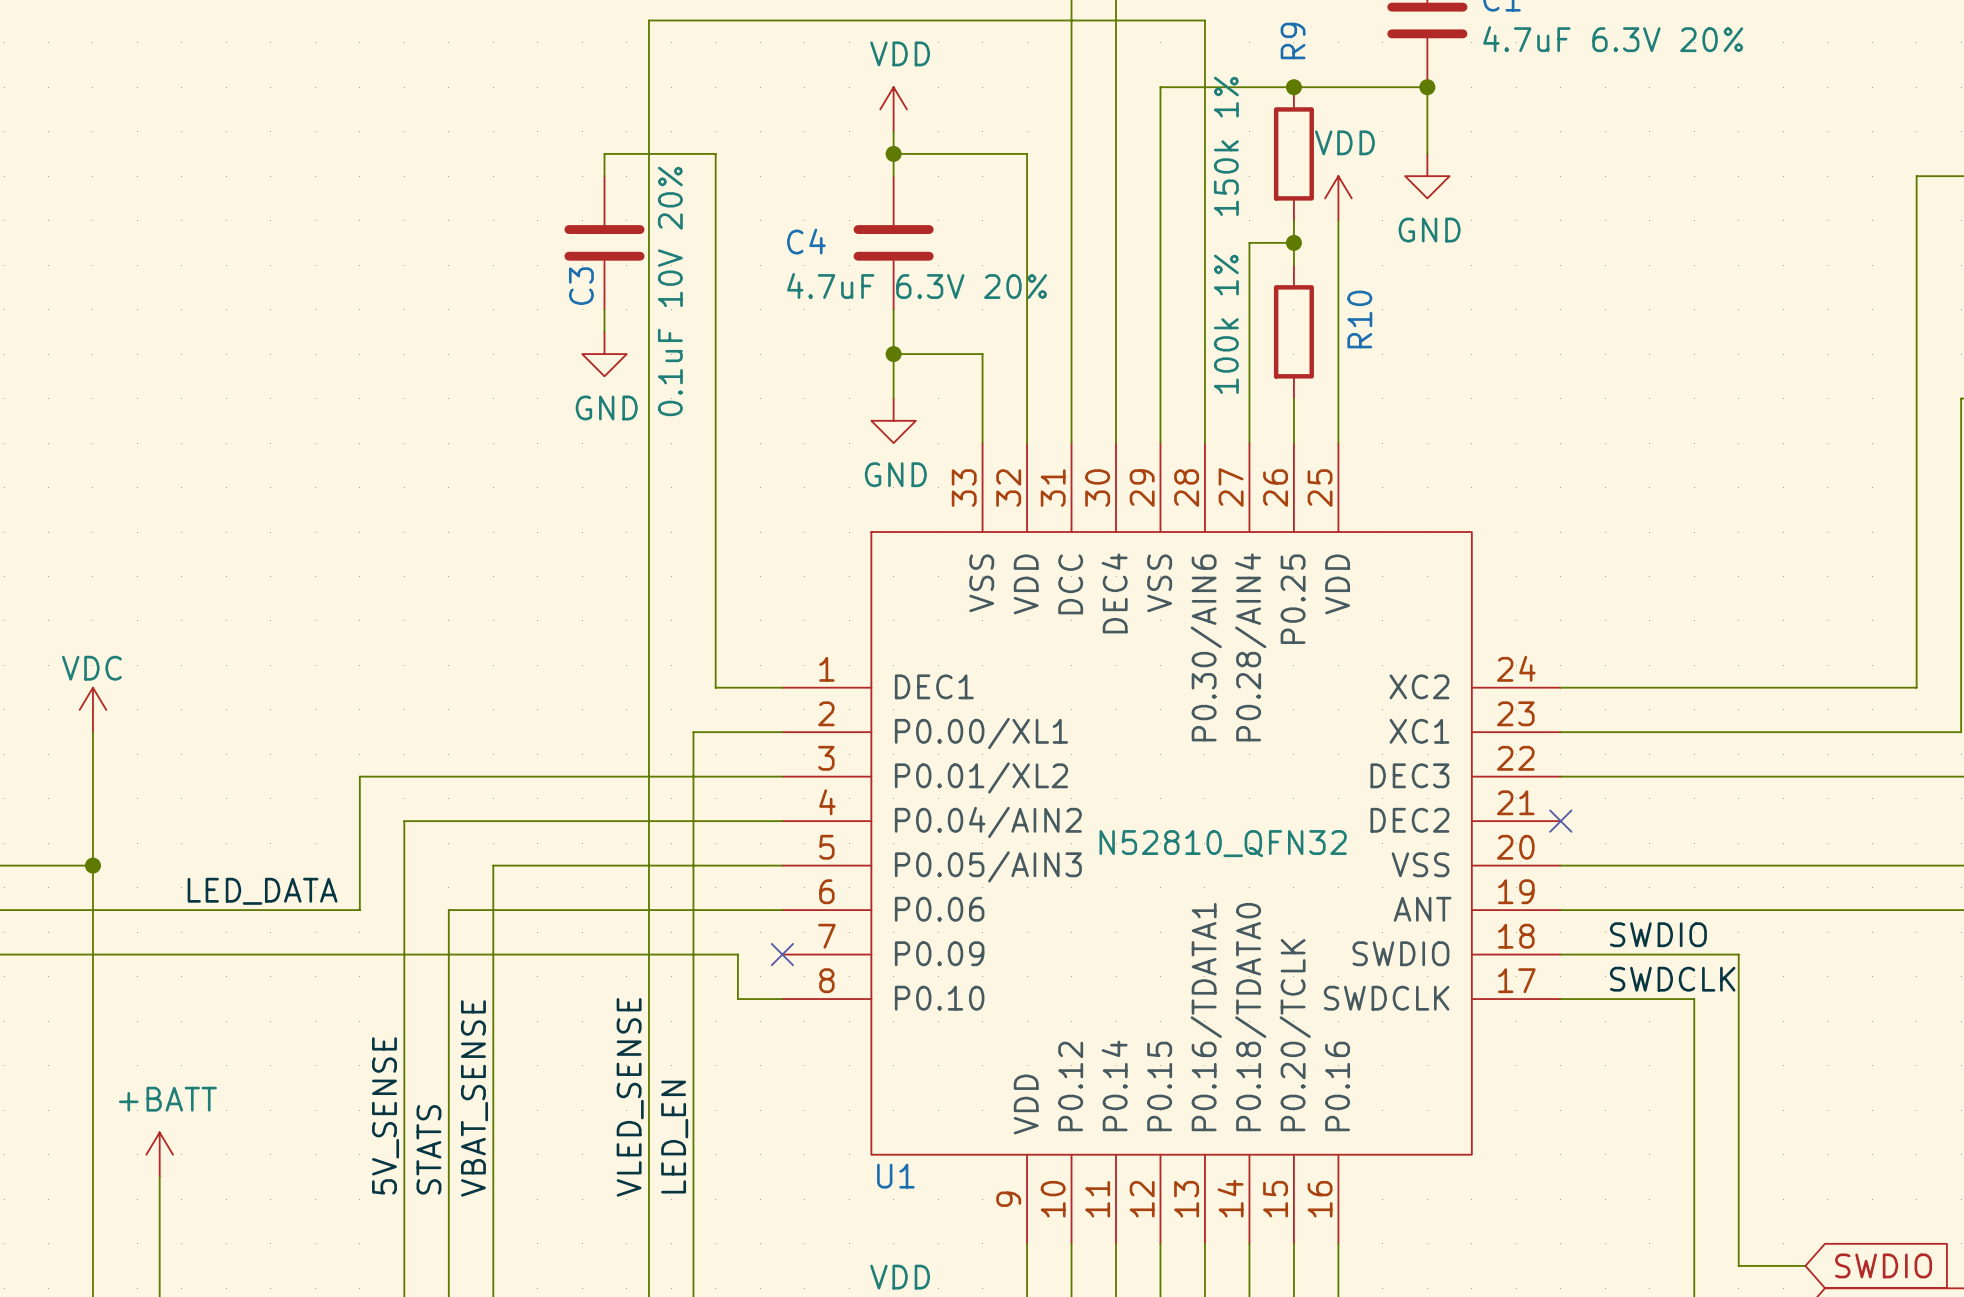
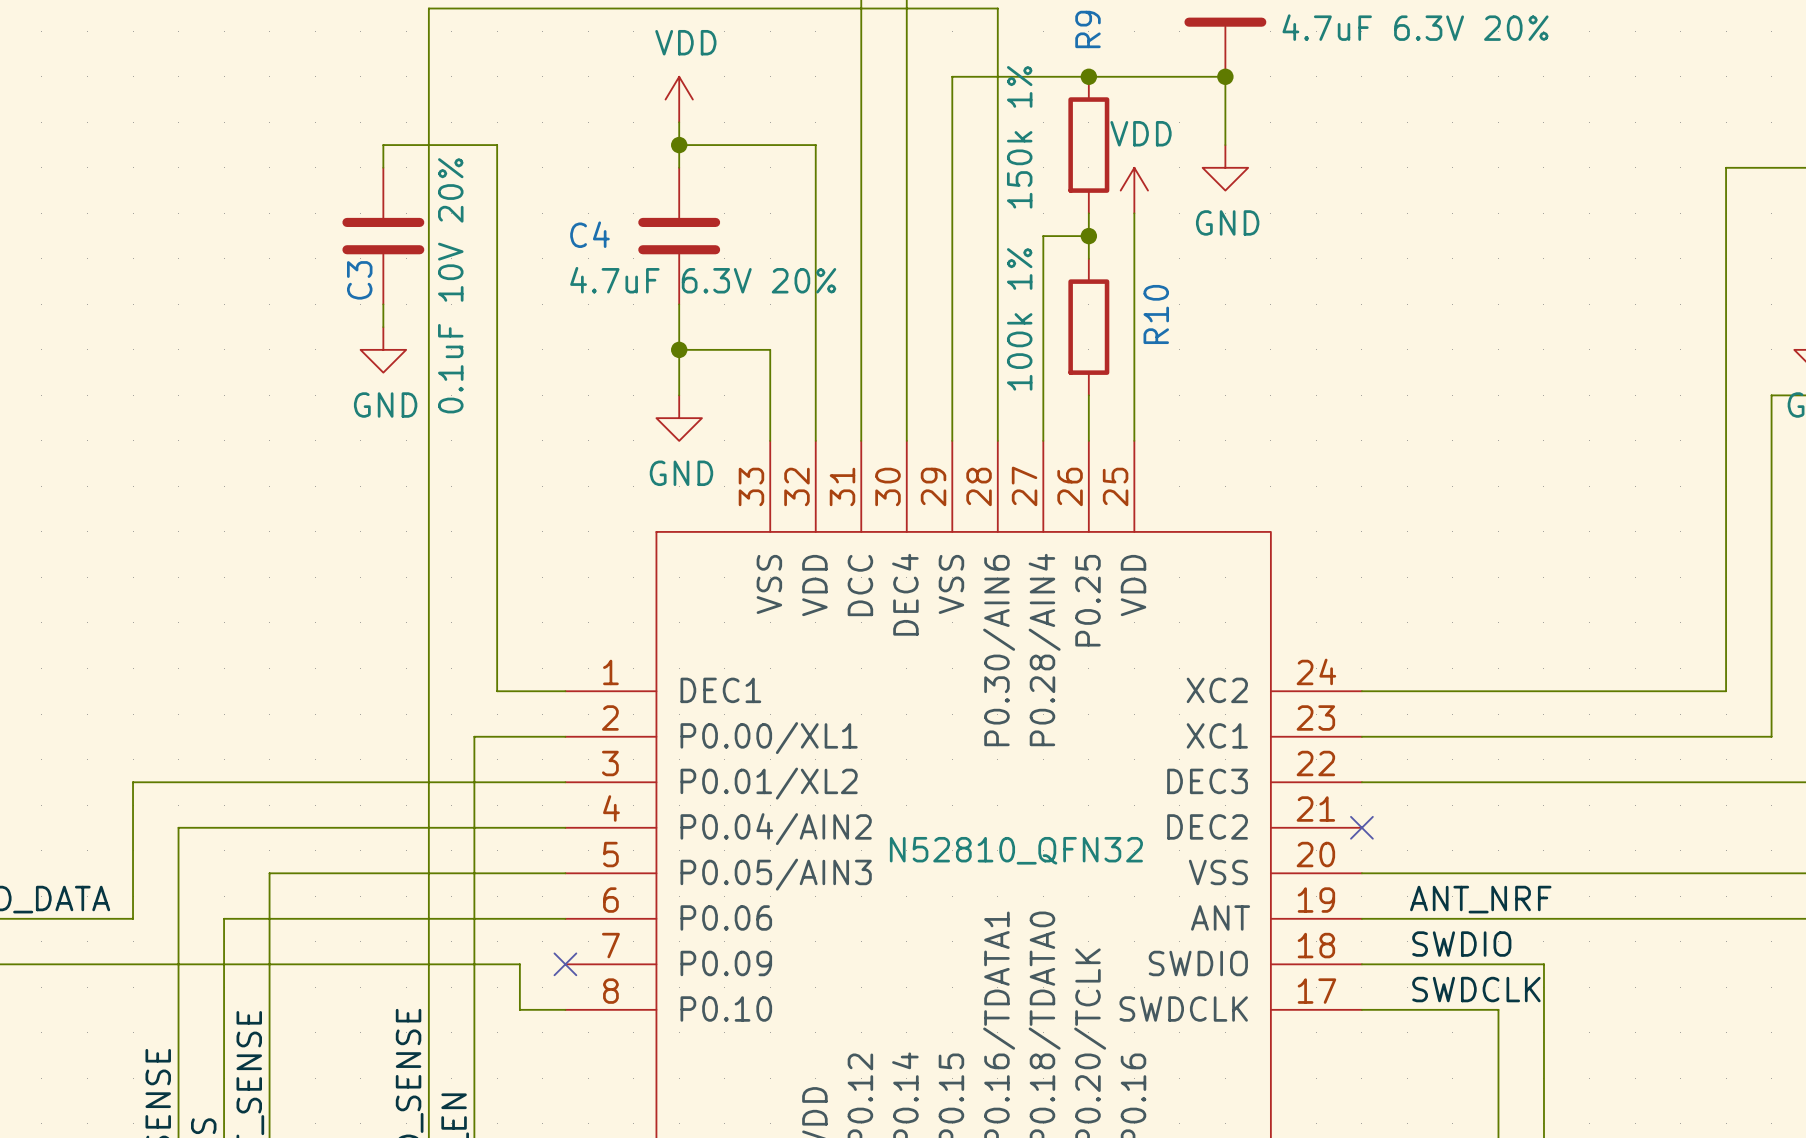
label: none -> ANT_NRF (1480, 899)

